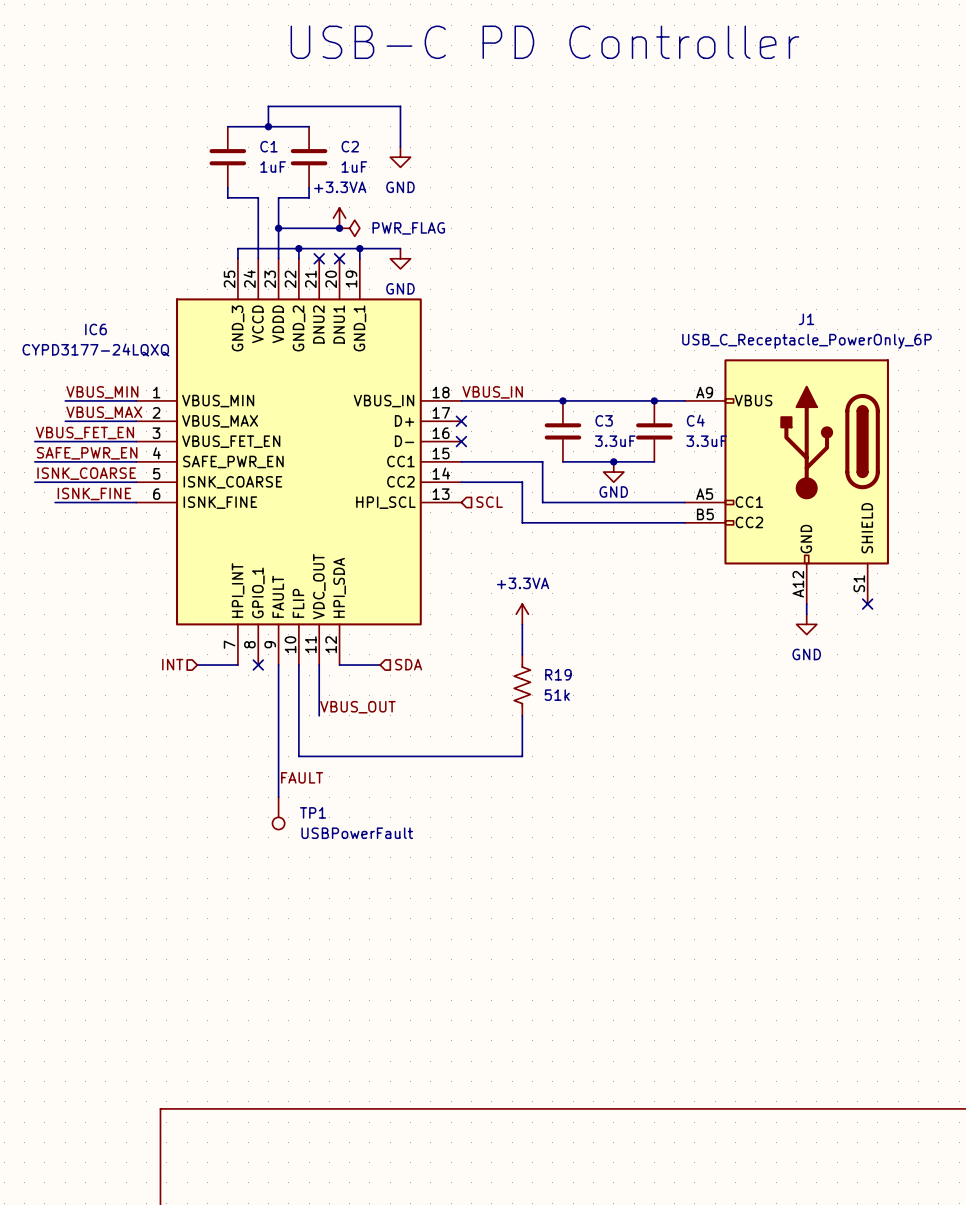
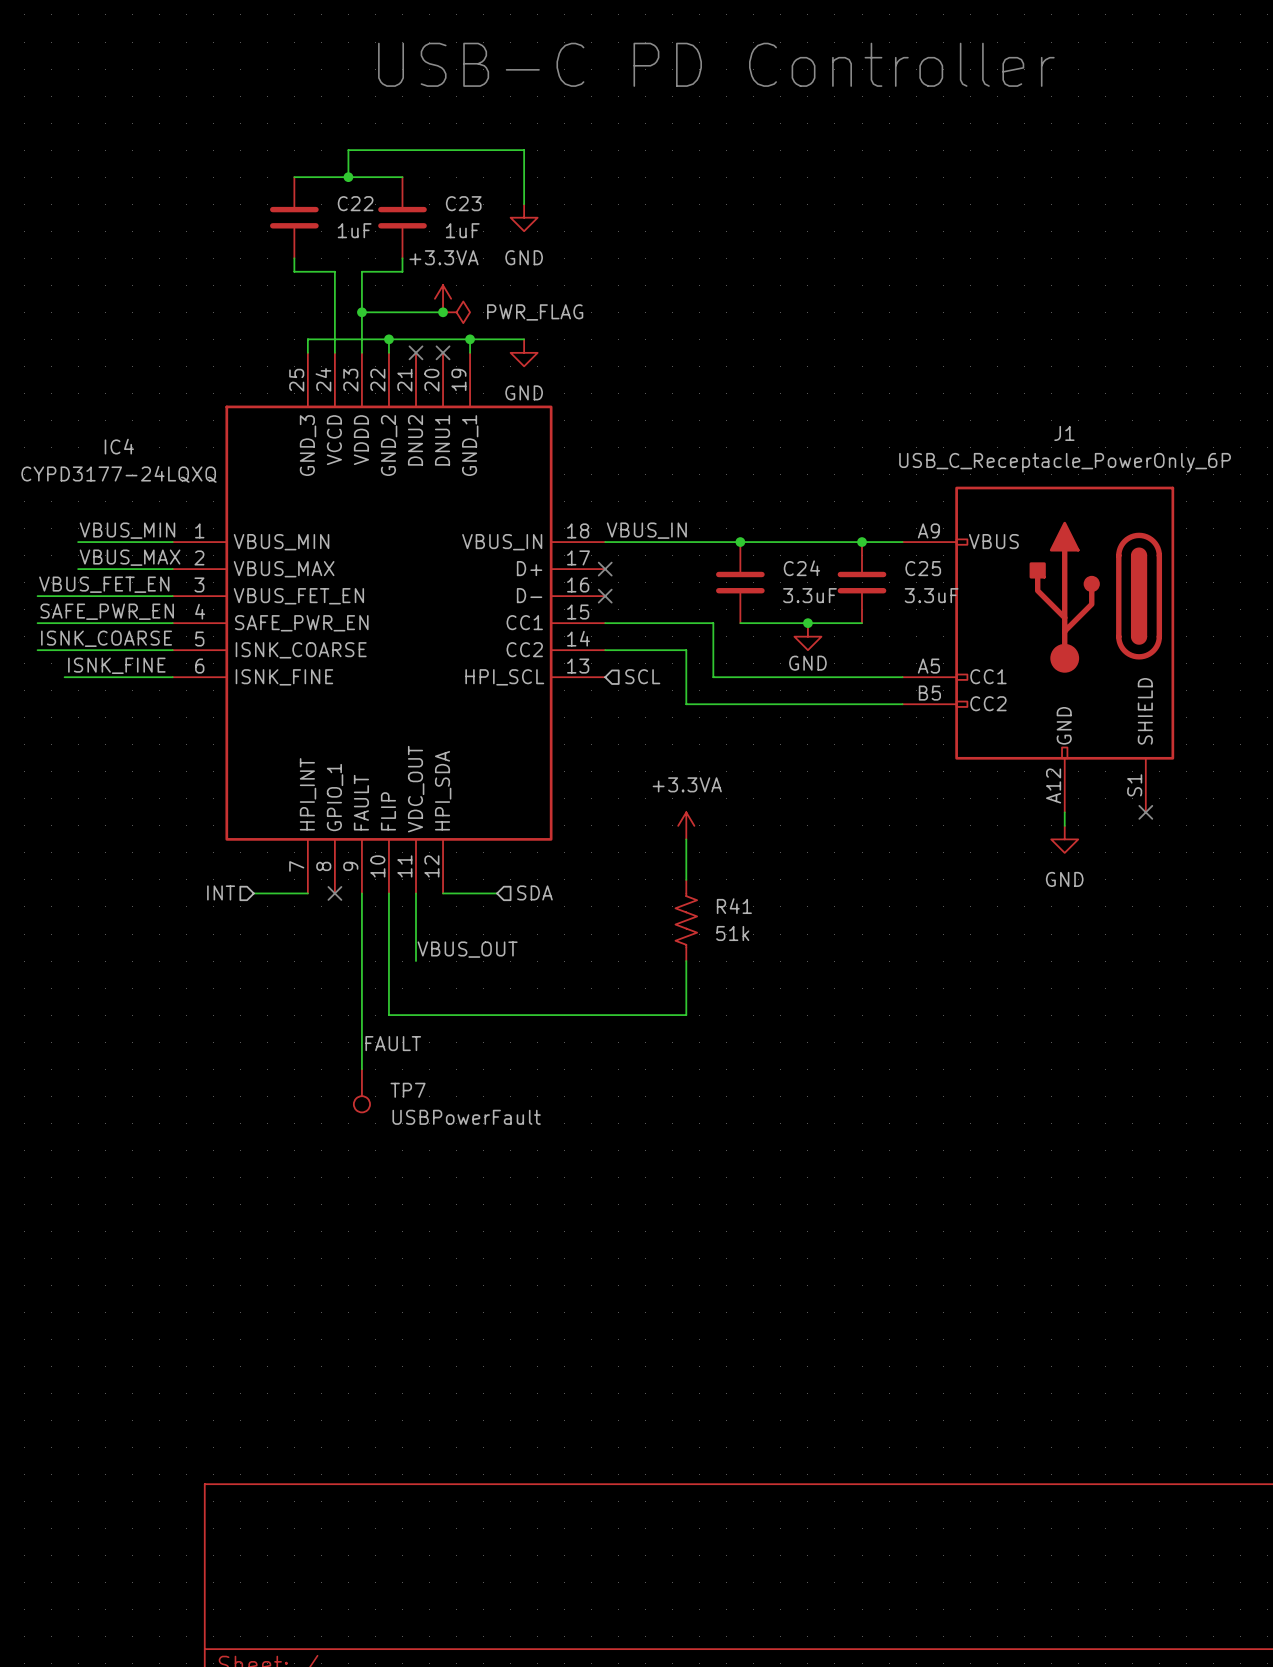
C1 name: C1 (268, 146) -> C22 (355, 203)
C2 name: C2 (350, 146) -> C23 (463, 203)
IC6 name: IC6 (96, 329) -> IC4 (119, 446)
C3 name: C3 (604, 420) -> C24 (801, 568)
C4 name: C4 (695, 420) -> C25 (923, 568)
R19 name: R19 (558, 674) -> R41 (734, 906)
TP1 name: TP1 (313, 812) -> TP7 (408, 1090)

